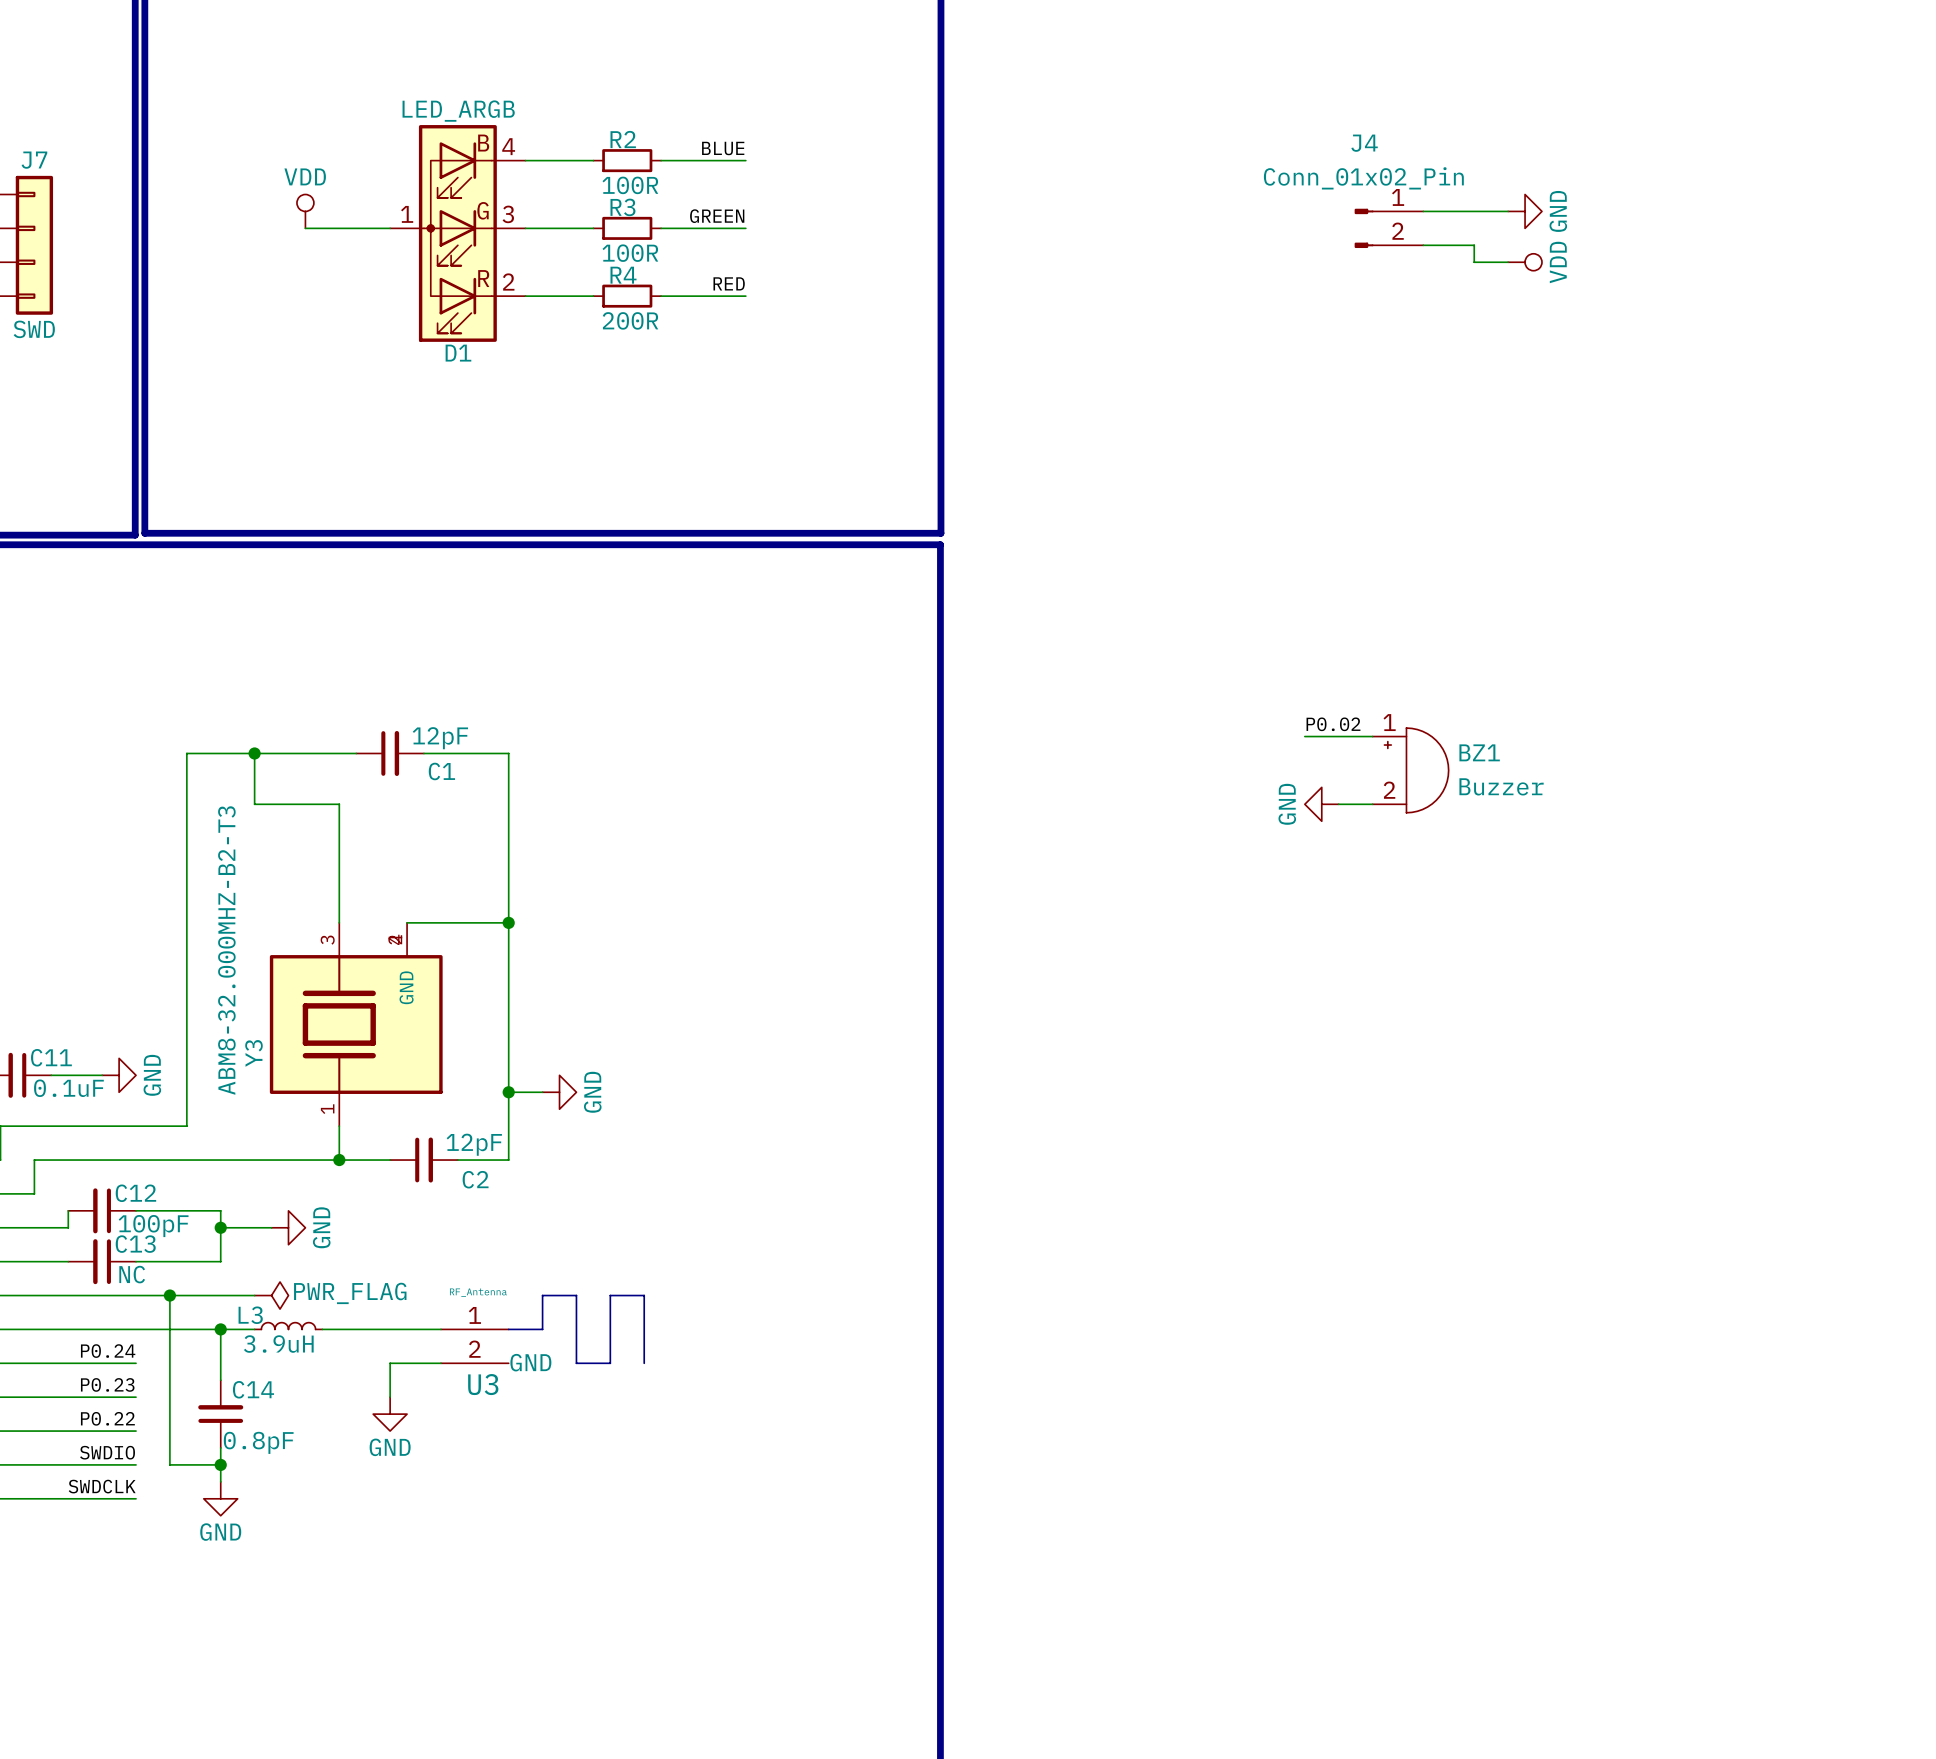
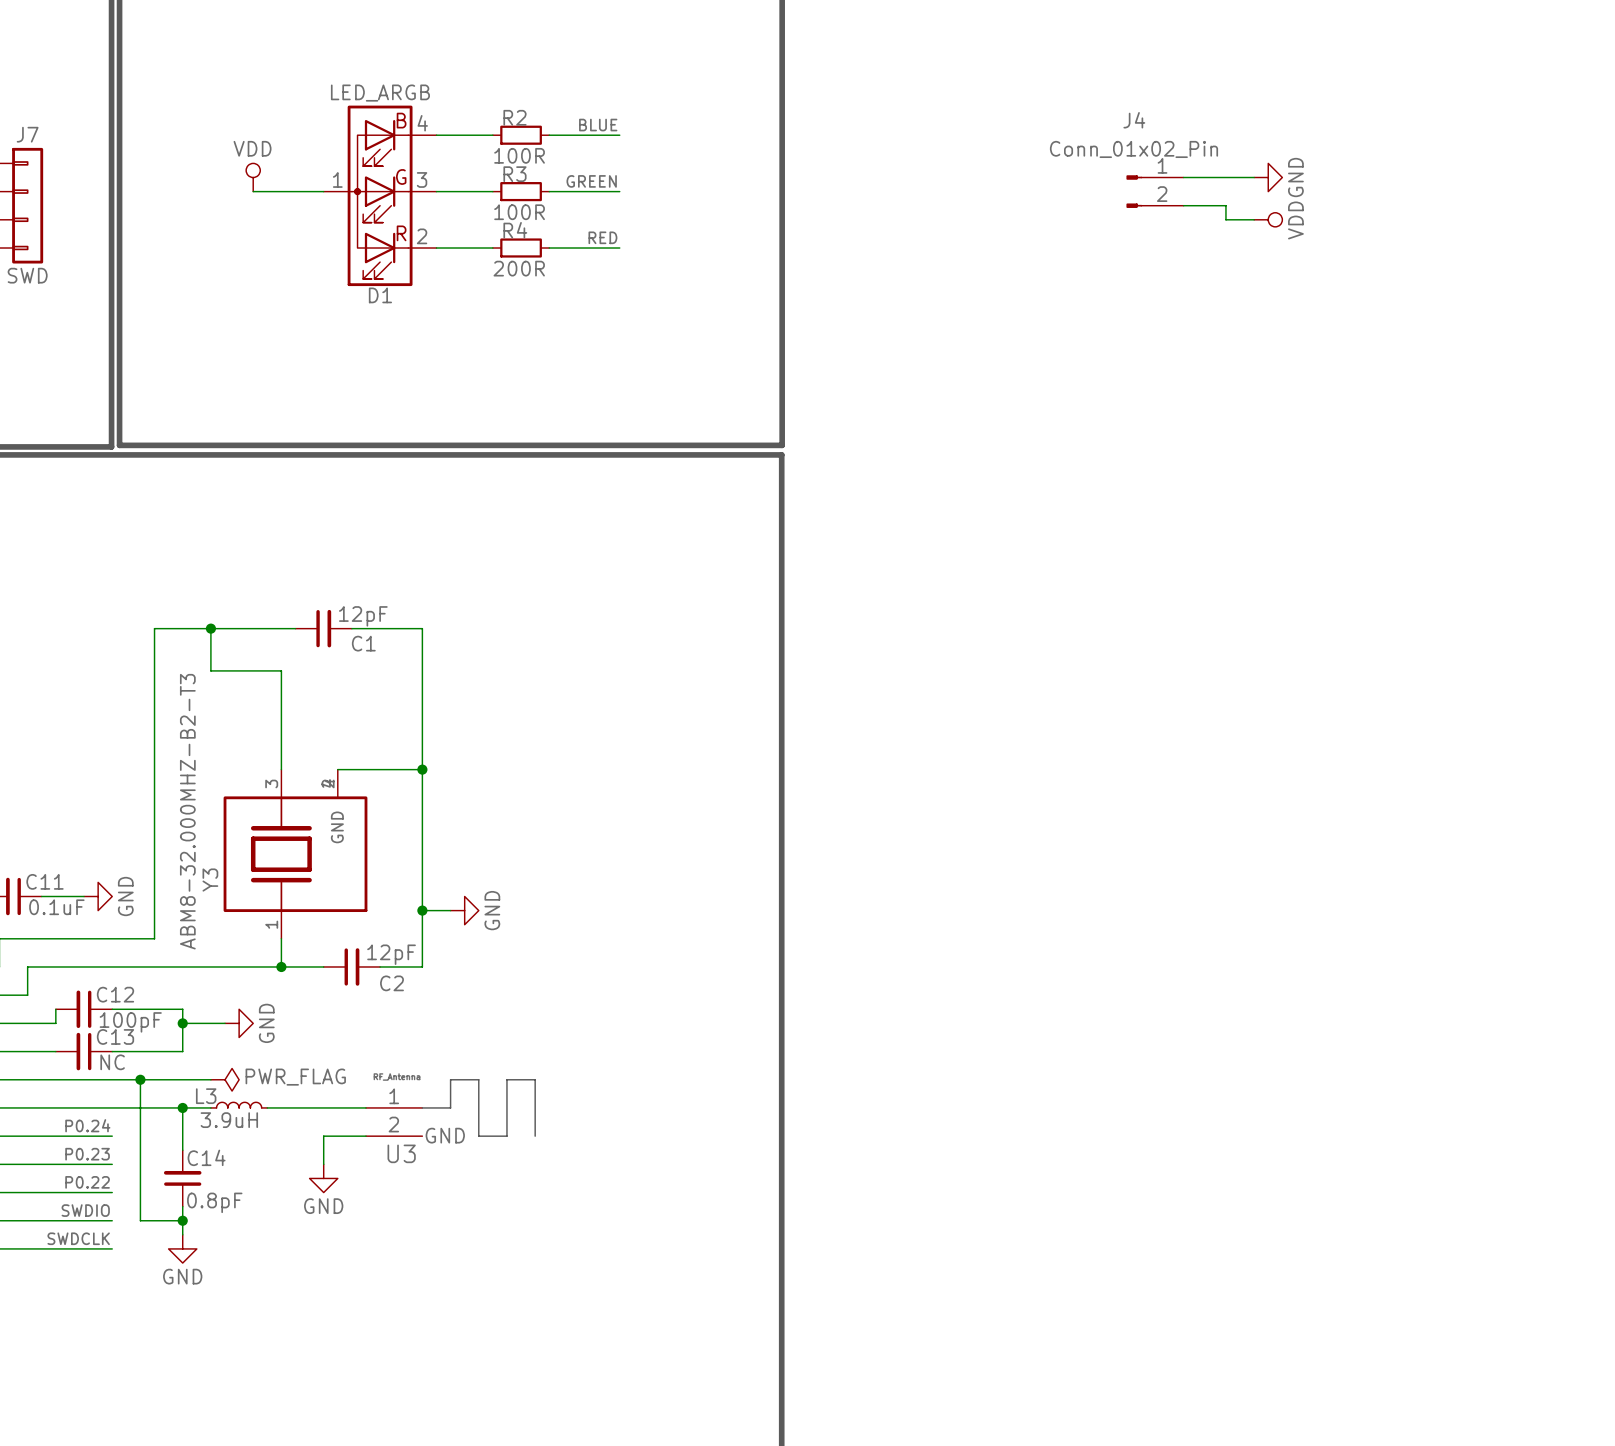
label: P0.02 (1333, 724) -> none
wire: (1304, 736) (1372, 736) -> none
BZ1: Buzzer (1410, 770) -> none
power symbol: GND (1321, 804) -> none
wire: (1338, 804) (1372, 804) -> none

